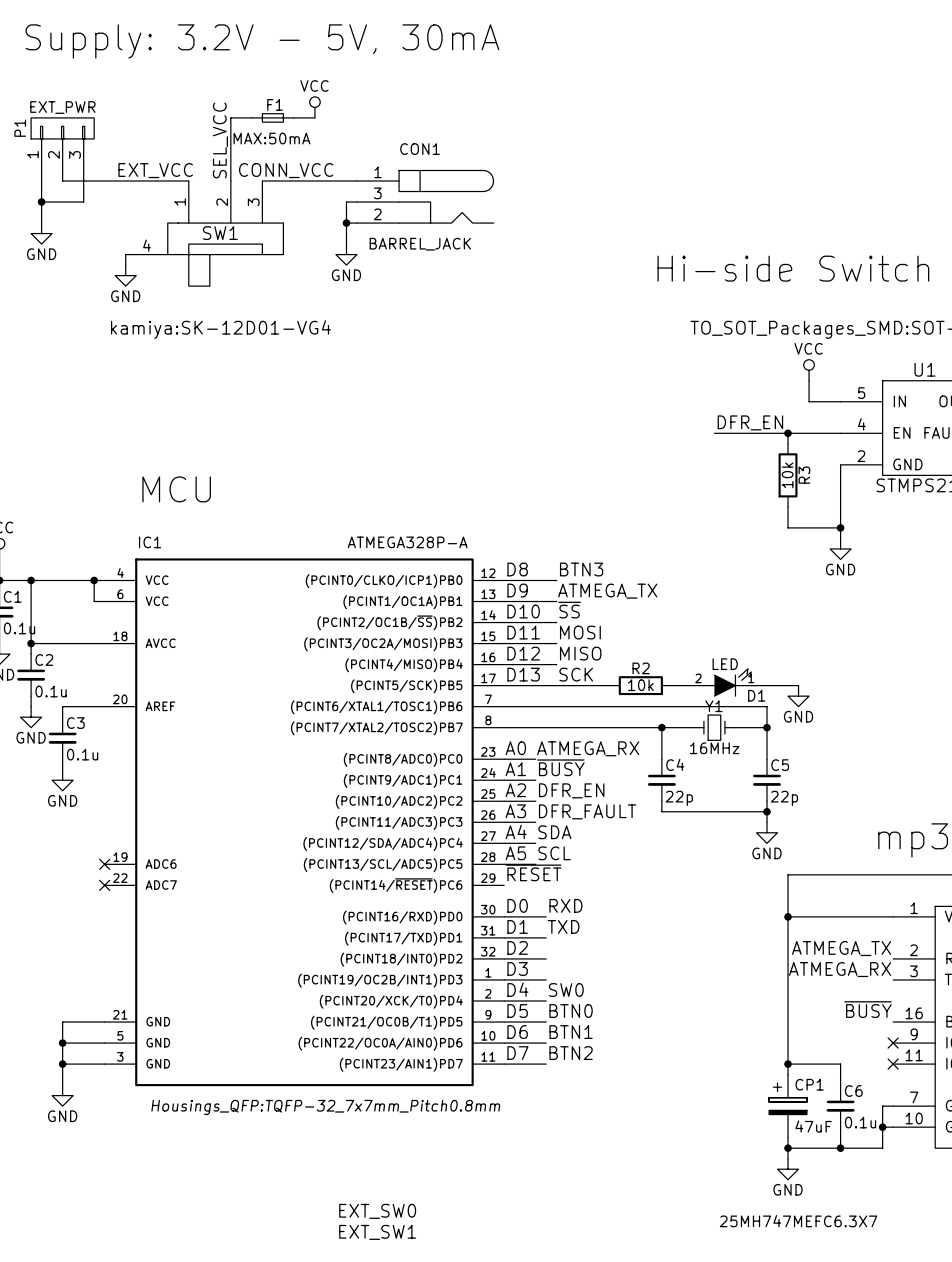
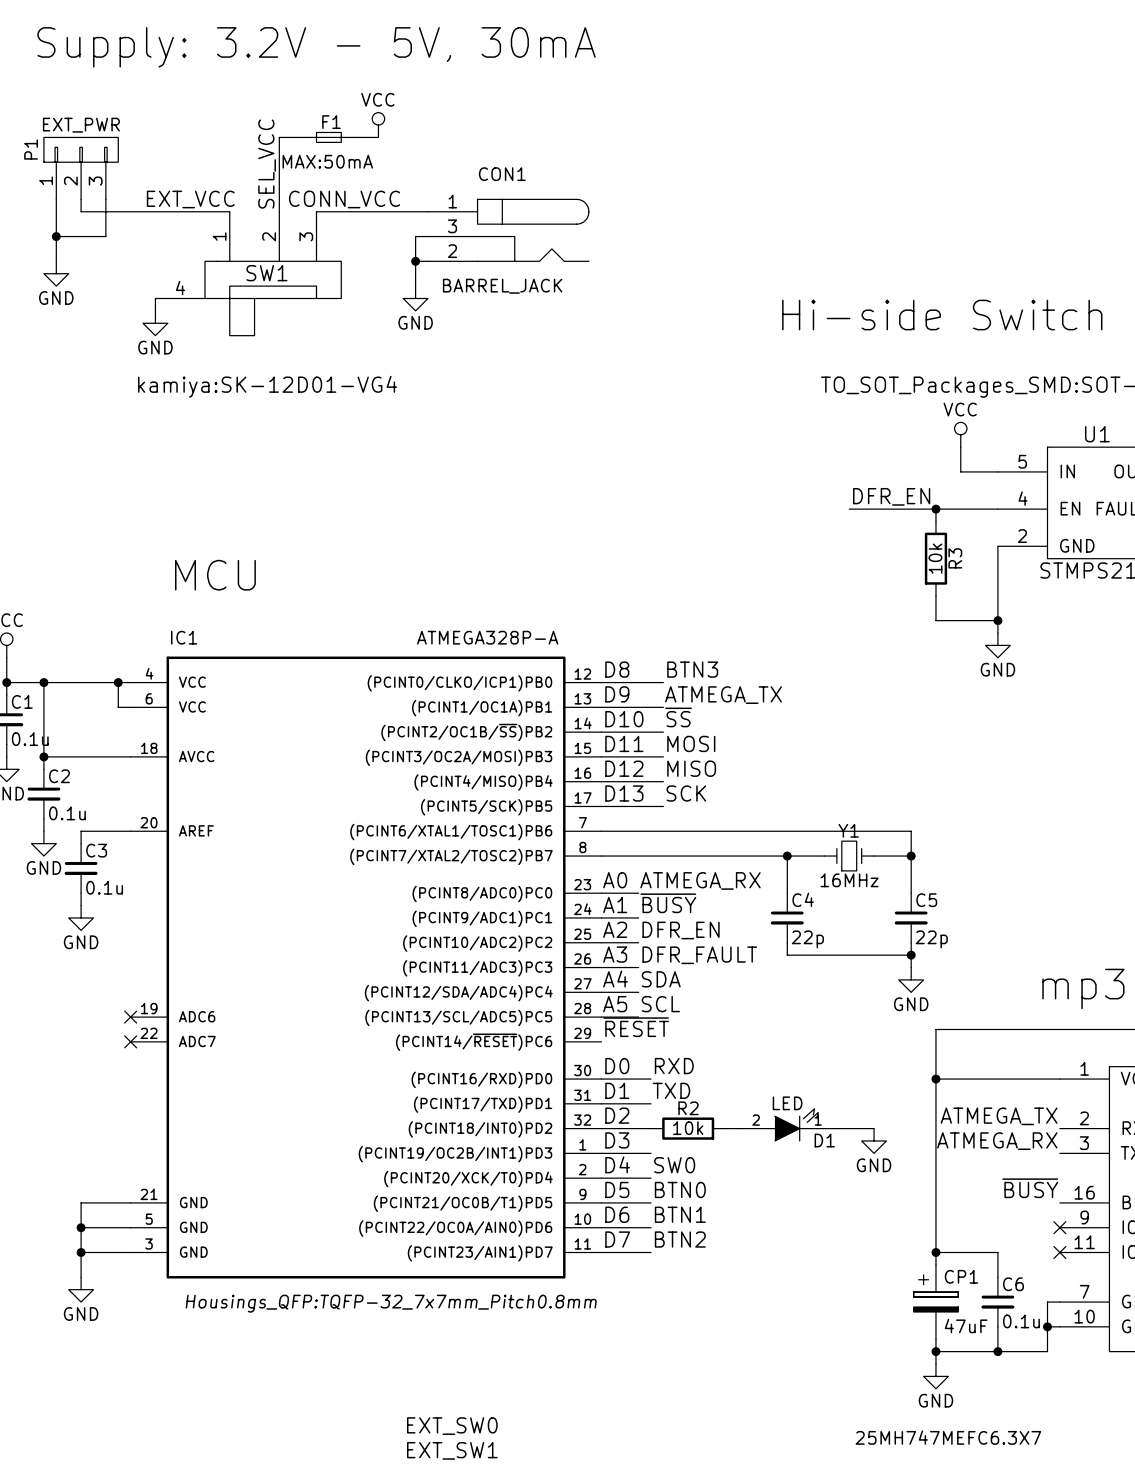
D1 position: (724, 682) -> (787, 1124)
wire: (556, 685) (609, 685) -> none
R2 position: (640, 685) -> (688, 1128)
wire: (672, 685) (682, 685) -> none
wire: (767, 685) (798, 685) -> none
power symbol: GND (798, 696) -> none
wire: none -> (725, 1128) (737, 1128)
wire: none -> (836, 1128) (874, 1128)
power symbol: none -> GND (874, 1140)

